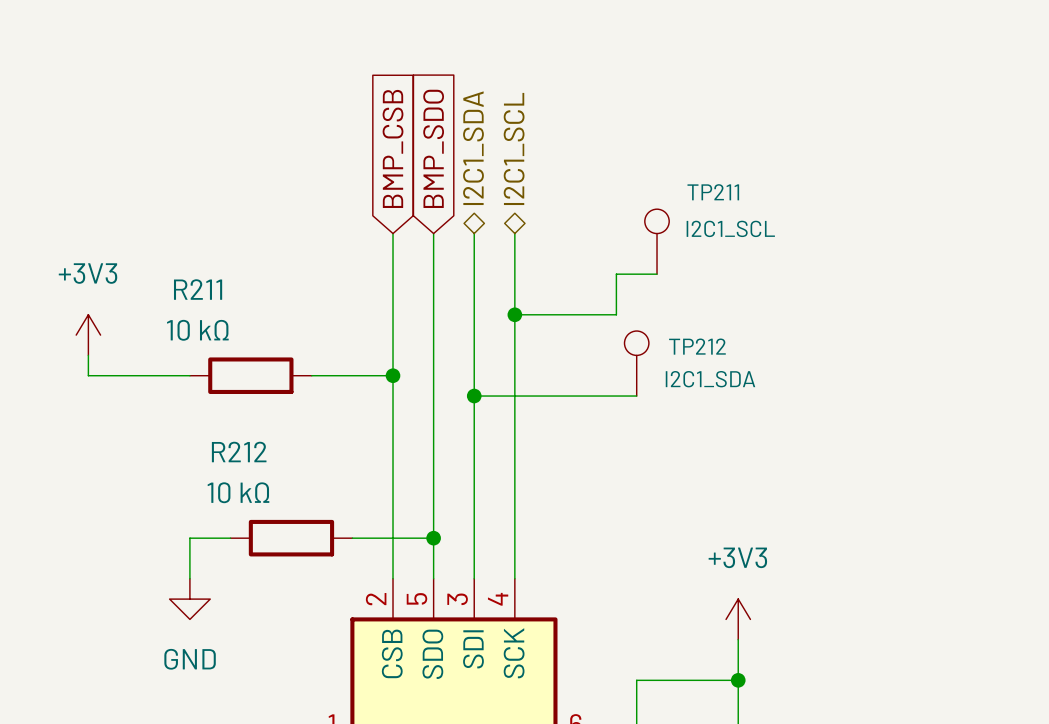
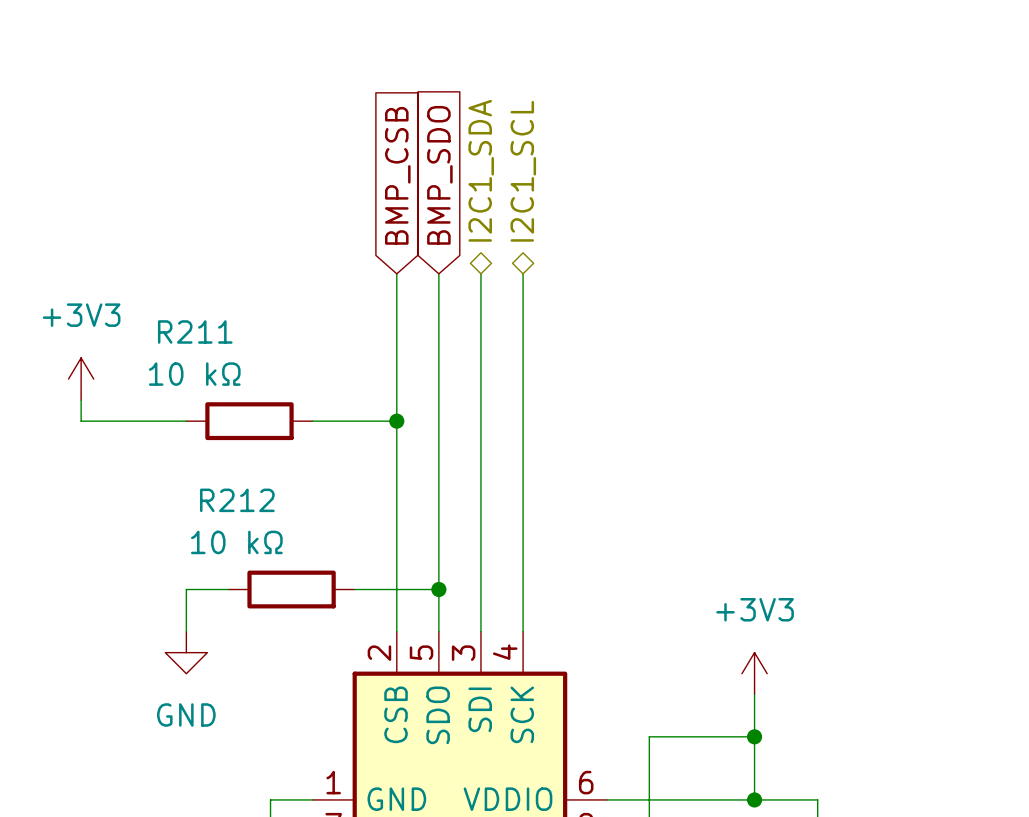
TP211: I2C1_SCL (657, 241) -> none
wire: (657, 274) (616, 274) (616, 314) (514, 314) -> none
junction: (514, 314) -> none
TP212: I2C1_SDA (636, 363) -> none
wire: (474, 396) (636, 396) -> none
junction: (474, 396) -> none

